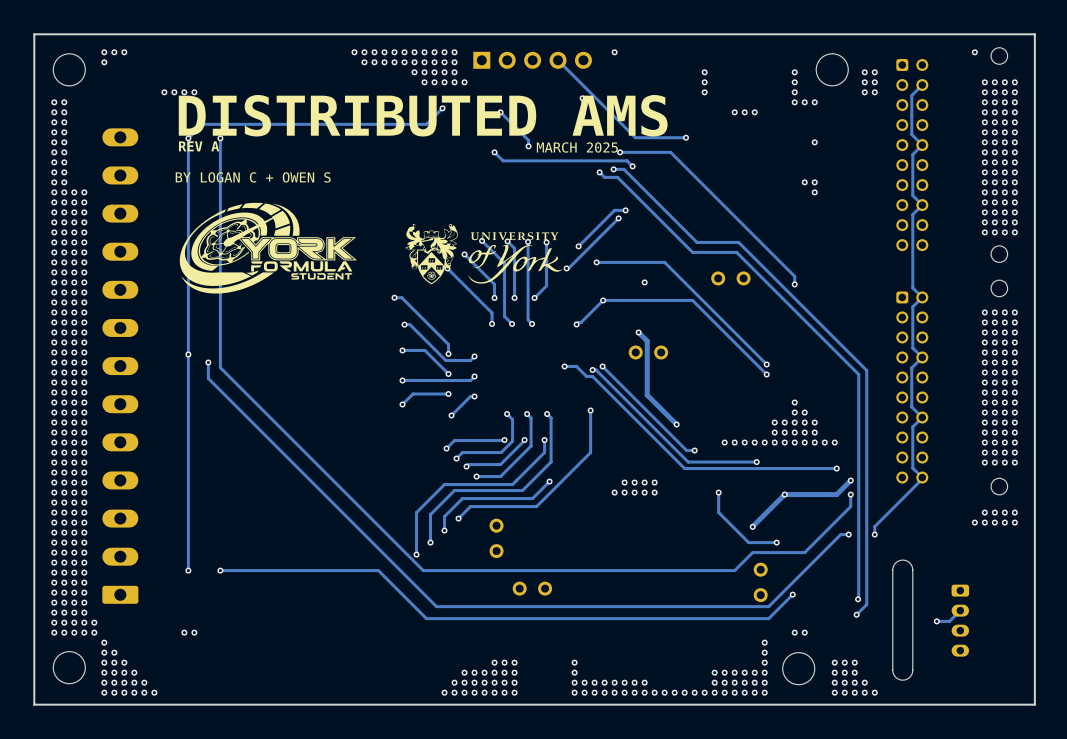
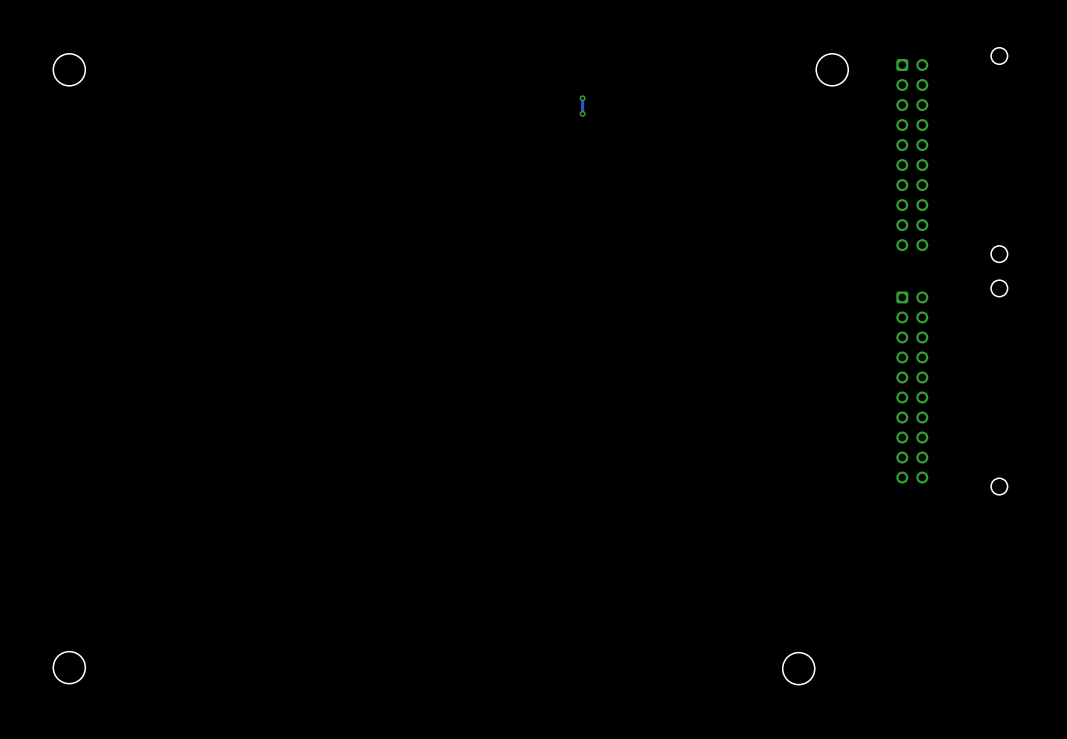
board edge: (1034, 34) (34, 34) (34, 704) (1034, 704) (1034, 34) -> none
via: (104, 52) -> none
via: (114, 52) -> none
via: (124, 52) -> none
via: (354, 52) -> none
via: (364, 52) -> none
via: (374, 52) -> none
via: (384, 52) -> none
via: (394, 52) -> none
via: (404, 52) -> none
via: (414, 52) -> none
via: (424, 52) -> none
via: (434, 52) -> none
via: (444, 52) -> none
via: (454, 52) -> none
via: (614, 52) -> none
via: (974, 52) -> none
part: (532, 60) -> none
track: (558, 60) (635, 137) (686, 137) -> none
via: (104, 62) -> none
via: (364, 62) -> none
via: (374, 62) -> none
via: (384, 62) -> none
via: (394, 62) -> none
via: (404, 62) -> none
via: (414, 62) -> none
via: (424, 62) -> none
via: (434, 62) -> none
via: (444, 62) -> none
via: (454, 62) -> none
via: (414, 72) -> none
via: (424, 72) -> none
via: (434, 72) -> none
via: (444, 72) -> none
via: (454, 72) -> none
via: (704, 72) -> none
via: (794, 72) -> none
via: (864, 72) -> none
via: (874, 72) -> none
via: (424, 82) -> none
via: (434, 82) -> none
via: (444, 82) -> none
via: (454, 82) -> none
via: (464, 82) -> none
via: (704, 82) -> none
via: (794, 82) -> none
via: (864, 82) -> none
via: (874, 82) -> none
via: (984, 82) -> none
via: (994, 82) -> none
via: (1004, 82) -> none
via: (1014, 82) -> none
track: (922, 85) (911, 95) (911, 134) (922, 145) (912, 154) (912, 195) (922, 205) (912, 214) (912, 287) (922, 297) (912, 306) (912, 347) (922, 357) (911, 367) (911, 407) (922, 417) (912, 427) (912, 468) (922, 479) (874, 526) (874, 534) -> none
via: (164, 92) -> none
via: (174, 92) -> none
via: (184, 92) -> none
via: (194, 92) -> none
via: (704, 92) -> none
via: (794, 92) -> none
via: (864, 92) -> none
via: (874, 92) -> none
via: (984, 92) -> none
via: (994, 92) -> none
via: (1004, 92) -> none
via: (1014, 92) -> none
via: (54, 102) -> none
via: (64, 102) -> none
via: (794, 102) -> none
via: (804, 102) -> none
via: (814, 102) -> none
via: (984, 102) -> none
via: (994, 102) -> none
via: (1004, 102) -> none
via: (1014, 102) -> none
track: (442, 108) (426, 124) (202, 124) (188, 138) (188, 570) -> none
via: (442, 108) -> none
via: (54, 112) -> none
via: (64, 112) -> none
track: (500, 112) (528, 140) (528, 146) -> none
via: (500, 112) -> none
via: (734, 112) -> none
via: (744, 112) -> none
via: (754, 112) -> none
via: (984, 112) -> none
via: (994, 112) -> none
via: (1004, 112) -> none
via: (1014, 112) -> none
text: DISTRIBUTED AMS (423, 115) -> none
via: (54, 122) -> none
via: (64, 122) -> none
via: (984, 122) -> none
via: (994, 122) -> none
via: (1004, 122) -> none
via: (1014, 122) -> none
via: (54, 132) -> none
via: (64, 132) -> none
via: (984, 132) -> none
via: (994, 132) -> none
via: (1004, 132) -> none
via: (1014, 132) -> none
via: (686, 137) -> none
via: (188, 138) -> none
track: (220, 138) (220, 367) (423, 570) (734, 570) (752, 552) (804, 552) (850, 506) (850, 494) -> none
via: (220, 138) -> none
via: (54, 142) -> none
via: (64, 142) -> none
via: (814, 142) -> none
via: (984, 142) -> none
via: (994, 142) -> none
via: (1004, 142) -> none
via: (1014, 142) -> none
text: REV A (199, 146) -> none
via: (528, 146) -> none
text: MARCH 2025 (577, 147) -> none
via: (54, 152) -> none
via: (64, 152) -> none
track: (494, 152) (503, 160) (627, 160) (632, 166) -> none
via: (494, 152) -> none
track: (620, 152) (670, 152) (794, 276) (794, 284) -> none
via: (620, 152) -> none
via: (984, 152) -> none
via: (994, 152) -> none
via: (1004, 152) -> none
via: (1014, 152) -> none
via: (54, 162) -> none
via: (64, 162) -> none
via: (984, 162) -> none
via: (994, 162) -> none
via: (1004, 162) -> none
via: (1014, 162) -> none
via: (632, 166) -> none
track: (613, 169) (623, 169) (697, 242) (738, 242) (866, 370) (866, 604) (856, 614) -> none
via: (613, 169) -> none
via: (54, 172) -> none
via: (64, 172) -> none
track: (599, 172) (604, 177) (617, 177) (692, 252) (736, 252) (858, 374) (858, 599) -> none
via: (599, 172) -> none
via: (984, 172) -> none
via: (994, 172) -> none
via: (1004, 172) -> none
via: (1014, 172) -> none
text: BY LOGAN C + OWEN S (253, 177) -> none
via: (54, 182) -> none
via: (64, 182) -> none
via: (804, 182) -> none
via: (814, 182) -> none
via: (984, 182) -> none
via: (994, 182) -> none
via: (1004, 182) -> none
via: (1014, 182) -> none
via: (54, 192) -> none
via: (64, 192) -> none
via: (74, 192) -> none
via: (84, 192) -> none
via: (814, 192) -> none
via: (984, 192) -> none
via: (994, 192) -> none
via: (1004, 192) -> none
via: (1014, 192) -> none
via: (54, 202) -> none
via: (64, 202) -> none
via: (74, 202) -> none
via: (84, 202) -> none
drawing: [179, 202, 357, 294] -> none
via: (984, 202) -> none
via: (994, 202) -> none
via: (1004, 202) -> none
via: (1014, 202) -> none
track: (625, 210) (614, 210) (578, 246) -> none
via: (625, 210) -> none
via: (54, 212) -> none
via: (64, 212) -> none
via: (74, 212) -> none
via: (84, 212) -> none
via: (984, 212) -> none
via: (994, 212) -> none
via: (1004, 212) -> none
via: (1014, 212) -> none
track: (618, 218) (566, 268) -> none
via: (618, 218) -> none
via: (54, 222) -> none
via: (64, 222) -> none
via: (74, 222) -> none
via: (84, 222) -> none
via: (984, 222) -> none
via: (994, 222) -> none
via: (1004, 222) -> none
via: (1014, 222) -> none
drawing: [405, 223, 563, 285] -> none
via: (54, 232) -> none
via: (64, 232) -> none
via: (74, 232) -> none
via: (84, 232) -> none
via: (984, 232) -> none
via: (994, 232) -> none
via: (1004, 232) -> none
via: (1014, 232) -> none
track: (482, 240) (504, 263) (504, 316) (512, 323) -> none
via: (482, 240) -> none
track: (507, 241) (514, 248) (514, 297) -> none
via: (507, 241) -> none
track: (528, 241) (528, 319) (532, 323) -> none
via: (528, 241) -> none
via: (54, 242) -> none
via: (64, 242) -> none
via: (74, 242) -> none
via: (84, 242) -> none
track: (546, 242) (546, 285) (534, 297) -> none
via: (546, 242) -> none
via: (578, 246) -> none
via: (54, 252) -> none
via: (64, 252) -> none
via: (74, 252) -> none
via: (84, 252) -> none
track: (464, 254) (494, 284) (494, 297) -> none
via: (464, 254) -> none
via: (54, 262) -> none
via: (64, 262) -> none
via: (74, 262) -> none
via: (84, 262) -> none
track: (596, 262) (664, 262) (766, 364) -> none
via: (596, 262) -> none
track: (447, 268) (492, 312) (492, 323) -> none
via: (447, 268) -> none
via: (566, 268) -> none
via: (54, 272) -> none
via: (64, 272) -> none
via: (74, 272) -> none
via: (84, 272) -> none
part: (730, 278) -> none
via: (54, 282) -> none
via: (64, 282) -> none
via: (74, 282) -> none
via: (84, 282) -> none
via: (644, 282) -> none
via: (794, 284) -> none
via: (54, 292) -> none
via: (64, 292) -> none
via: (74, 292) -> none
via: (84, 292) -> none
track: (394, 297) (401, 297) (448, 344) (448, 353) -> none
via: (394, 297) -> none
via: (494, 297) -> none
via: (514, 297) -> none
via: (534, 297) -> none
via: (603, 300) -> none
via: (54, 302) -> none
via: (64, 302) -> none
via: (74, 302) -> none
via: (84, 302) -> none
via: (54, 312) -> none
via: (64, 312) -> none
via: (74, 312) -> none
via: (84, 312) -> none
via: (984, 312) -> none
via: (994, 312) -> none
via: (1004, 312) -> none
via: (1014, 312) -> none
via: (54, 322) -> none
via: (64, 322) -> none
via: (74, 322) -> none
via: (84, 322) -> none
via: (984, 322) -> none
via: (994, 322) -> none
via: (1004, 322) -> none
via: (1014, 322) -> none
via: (492, 323) -> none
via: (512, 323) -> none
via: (532, 323) -> none
track: (404, 324) (410, 324) (445, 360) (470, 360) (474, 356) -> none
via: (404, 324) -> none
track: (576, 324) (581, 322) (603, 300) (692, 300) (766, 374) -> none
via: (576, 324) -> none
via: (54, 332) -> none
via: (64, 332) -> none
via: (74, 332) -> none
via: (84, 332) -> none
track: (638, 332) (647, 341) (647, 395) (676, 424) -> none
via: (638, 332) -> none
via: (984, 332) -> none
via: (994, 332) -> none
via: (1004, 332) -> none
via: (1014, 332) -> none
via: (54, 342) -> none
via: (64, 342) -> none
via: (74, 342) -> none
via: (84, 342) -> none
via: (984, 342) -> none
via: (994, 342) -> none
via: (1004, 342) -> none
via: (1014, 342) -> none
track: (402, 350) (425, 350) (448, 373) -> none
via: (402, 350) -> none
via: (54, 352) -> none
via: (64, 352) -> none
via: (74, 352) -> none
via: (84, 352) -> none
part: (648, 352) -> none
via: (984, 352) -> none
via: (994, 352) -> none
via: (1004, 352) -> none
via: (1014, 352) -> none
via: (448, 353) -> none
via: (188, 354) -> none
via: (474, 356) -> none
via: (54, 362) -> none
via: (64, 362) -> none
via: (74, 362) -> none
via: (84, 362) -> none
track: (208, 362) (208, 378) (436, 606) (768, 606) (840, 534) (848, 534) -> none
via: (208, 362) -> none
via: (984, 362) -> none
via: (994, 362) -> none
via: (1004, 362) -> none
via: (1014, 362) -> none
via: (766, 364) -> none
part: (120, 366) -> none
track: (564, 366) (576, 366) (586, 376) (592, 376) (684, 468) (836, 468) -> none
via: (564, 366) -> none
track: (602, 366) (686, 450) (694, 450) -> none
via: (602, 366) -> none
track: (592, 369) (596, 369) (688, 462) (756, 462) -> none
via: (592, 369) -> none
via: (54, 372) -> none
via: (64, 372) -> none
via: (74, 372) -> none
via: (84, 372) -> none
via: (984, 372) -> none
via: (994, 372) -> none
via: (1004, 372) -> none
via: (1014, 372) -> none
via: (448, 373) -> none
via: (766, 374) -> none
track: (474, 376) (470, 380) (402, 380) -> none
via: (474, 376) -> none
via: (402, 380) -> none
via: (54, 382) -> none
via: (64, 382) -> none
via: (74, 382) -> none
via: (84, 382) -> none
via: (984, 382) -> none
via: (994, 382) -> none
via: (1004, 382) -> none
via: (1014, 382) -> none
via: (54, 392) -> none
via: (64, 392) -> none
via: (74, 392) -> none
via: (84, 392) -> none
via: (984, 392) -> none
via: (994, 392) -> none
via: (1004, 392) -> none
via: (1014, 392) -> none
track: (448, 394) (413, 394) (402, 404) -> none
via: (448, 394) -> none
track: (474, 396) (470, 396) (451, 415) -> none
via: (474, 396) -> none
via: (54, 402) -> none
via: (64, 402) -> none
via: (74, 402) -> none
via: (84, 402) -> none
via: (794, 402) -> none
via: (984, 402) -> none
via: (994, 402) -> none
via: (1004, 402) -> none
via: (1014, 402) -> none
via: (402, 404) -> none
track: (590, 410) (590, 452) (536, 506) (470, 506) (458, 518) -> none
via: (590, 410) -> none
via: (54, 412) -> none
via: (64, 412) -> none
via: (74, 412) -> none
via: (84, 412) -> none
via: (794, 412) -> none
via: (804, 412) -> none
via: (984, 412) -> none
via: (994, 412) -> none
via: (1004, 412) -> none
via: (1014, 412) -> none
track: (507, 414) (512, 419) (512, 441) (501, 452) (462, 452) (456, 458) -> none
via: (507, 414) -> none
track: (527, 414) (531, 418) (531, 446) (500, 476) (476, 476) -> none
via: (527, 414) -> none
track: (547, 414) (551, 418) (551, 462) (522, 490) (454, 490) (430, 514) (430, 542) -> none
via: (547, 414) -> none
via: (451, 415) -> none
via: (54, 422) -> none
via: (64, 422) -> none
via: (74, 422) -> none
via: (84, 422) -> none
via: (774, 422) -> none
via: (784, 422) -> none
via: (794, 422) -> none
via: (804, 422) -> none
via: (814, 422) -> none
via: (984, 422) -> none
via: (994, 422) -> none
via: (1004, 422) -> none
via: (1014, 422) -> none
via: (676, 424) -> none
via: (54, 432) -> none
via: (64, 432) -> none
via: (74, 432) -> none
via: (84, 432) -> none
via: (774, 432) -> none
via: (784, 432) -> none
via: (794, 432) -> none
via: (804, 432) -> none
via: (814, 432) -> none
via: (984, 432) -> none
via: (994, 432) -> none
via: (1004, 432) -> none
via: (1014, 432) -> none
track: (504, 440) (454, 440) (446, 448) -> none
via: (504, 440) -> none
track: (524, 440) (500, 464) (468, 464) (466, 466) -> none
via: (524, 440) -> none
track: (544, 440) (544, 452) (512, 484) (444, 484) (416, 512) (416, 554) -> none
via: (544, 440) -> none
via: (54, 442) -> none
via: (64, 442) -> none
via: (74, 442) -> none
via: (84, 442) -> none
via: (724, 442) -> none
via: (734, 442) -> none
via: (744, 442) -> none
via: (754, 442) -> none
via: (764, 442) -> none
via: (774, 442) -> none
via: (784, 442) -> none
via: (794, 442) -> none
via: (804, 442) -> none
via: (814, 442) -> none
via: (824, 442) -> none
via: (834, 442) -> none
via: (984, 442) -> none
via: (994, 442) -> none
via: (1004, 442) -> none
via: (1014, 442) -> none
via: (446, 448) -> none
via: (694, 450) -> none
via: (54, 452) -> none
via: (64, 452) -> none
via: (74, 452) -> none
via: (84, 452) -> none
via: (984, 452) -> none
via: (994, 452) -> none
via: (1004, 452) -> none
via: (1014, 452) -> none
via: (456, 458) -> none
via: (54, 462) -> none
via: (64, 462) -> none
via: (74, 462) -> none
via: (84, 462) -> none
via: (756, 462) -> none
via: (984, 462) -> none
via: (994, 462) -> none
via: (1004, 462) -> none
via: (1014, 462) -> none
via: (466, 466) -> none
via: (836, 468) -> none
via: (54, 472) -> none
via: (64, 472) -> none
via: (74, 472) -> none
via: (84, 472) -> none
via: (476, 476) -> none
track: (850, 480) (836, 494) (784, 494) (752, 526) -> none
via: (850, 480) -> none
track: (549, 481) (532, 498) (462, 498) (444, 516) (444, 530) -> none
via: (549, 481) -> none
via: (54, 482) -> none
via: (64, 482) -> none
via: (74, 482) -> none
via: (84, 482) -> none
via: (624, 482) -> none
via: (634, 482) -> none
via: (644, 482) -> none
via: (654, 482) -> none
via: (54, 492) -> none
via: (64, 492) -> none
via: (74, 492) -> none
via: (84, 492) -> none
via: (614, 492) -> none
via: (624, 492) -> none
via: (634, 492) -> none
via: (644, 492) -> none
via: (654, 492) -> none
track: (718, 492) (718, 512) (748, 542) (776, 542) -> none
via: (718, 492) -> none
via: (784, 494) -> none
via: (850, 494) -> none
via: (54, 502) -> none
via: (64, 502) -> none
via: (74, 502) -> none
via: (84, 502) -> none
via: (54, 512) -> none
via: (64, 512) -> none
via: (74, 512) -> none
via: (84, 512) -> none
via: (984, 512) -> none
via: (994, 512) -> none
via: (1004, 512) -> none
via: (1014, 512) -> none
via: (458, 518) -> none
via: (54, 522) -> none
via: (64, 522) -> none
via: (74, 522) -> none
via: (84, 522) -> none
via: (974, 522) -> none
via: (984, 522) -> none
via: (994, 522) -> none
via: (1004, 522) -> none
via: (1014, 522) -> none
via: (752, 526) -> none
via: (444, 530) -> none
via: (54, 532) -> none
via: (64, 532) -> none
via: (74, 532) -> none
via: (84, 532) -> none
via: (848, 534) -> none
via: (874, 534) -> none
part: (496, 538) -> none
via: (54, 542) -> none
via: (64, 542) -> none
via: (74, 542) -> none
via: (84, 542) -> none
via: (430, 542) -> none
via: (776, 542) -> none
via: (54, 552) -> none
via: (64, 552) -> none
via: (74, 552) -> none
via: (84, 552) -> none
via: (416, 554) -> none
via: (54, 562) -> none
via: (64, 562) -> none
via: (74, 562) -> none
via: (84, 562) -> none
via: (188, 570) -> none
track: (220, 570) (378, 570) (426, 618) (768, 618) (792, 594) -> none
via: (220, 570) -> none
board edge: (912, 570) (912, 671) (908, 678) (901, 680) (896, 677) (892, 671) (892, 568) (896, 562) (902, 560) (910, 563) (912, 570) -> none
via: (54, 572) -> none
via: (64, 572) -> none
via: (74, 572) -> none
via: (84, 572) -> none
via: (54, 582) -> none
via: (64, 582) -> none
via: (74, 582) -> none
via: (84, 582) -> none
part: (760, 582) -> none
part: (532, 588) -> none
via: (54, 592) -> none
via: (64, 592) -> none
via: (74, 592) -> none
via: (84, 592) -> none
via: (792, 594) -> none
via: (858, 599) -> none
via: (54, 602) -> none
via: (64, 602) -> none
via: (74, 602) -> none
via: (84, 602) -> none
track: (960, 610) (949, 621) (936, 621) -> none
via: (54, 612) -> none
via: (64, 612) -> none
via: (74, 612) -> none
via: (84, 612) -> none
via: (856, 614) -> none
part: (960, 620) -> none
via: (936, 621) -> none
via: (54, 622) -> none
via: (64, 622) -> none
via: (74, 622) -> none
via: (84, 622) -> none
via: (94, 622) -> none
via: (54, 632) -> none
via: (64, 632) -> none
via: (74, 632) -> none
via: (84, 632) -> none
via: (94, 632) -> none
via: (184, 632) -> none
via: (194, 632) -> none
via: (794, 632) -> none
via: (804, 632) -> none
via: (104, 642) -> none
via: (764, 642) -> none
via: (104, 652) -> none
via: (114, 652) -> none
via: (764, 652) -> none
via: (104, 662) -> none
via: (114, 662) -> none
via: (124, 662) -> none
via: (494, 662) -> none
via: (504, 662) -> none
via: (514, 662) -> none
via: (574, 662) -> none
via: (764, 662) -> none
via: (834, 662) -> none
via: (844, 662) -> none
via: (854, 662) -> none
via: (104, 672) -> none
via: (114, 672) -> none
via: (124, 672) -> none
via: (134, 672) -> none
via: (464, 672) -> none
via: (474, 672) -> none
via: (484, 672) -> none
via: (494, 672) -> none
via: (504, 672) -> none
via: (514, 672) -> none
via: (574, 672) -> none
via: (714, 672) -> none
via: (724, 672) -> none
via: (734, 672) -> none
via: (744, 672) -> none
via: (754, 672) -> none
via: (764, 672) -> none
via: (834, 672) -> none
via: (844, 672) -> none
via: (854, 672) -> none
via: (104, 682) -> none
via: (114, 682) -> none
via: (124, 682) -> none
via: (134, 682) -> none
via: (144, 682) -> none
via: (454, 682) -> none
via: (464, 682) -> none
via: (474, 682) -> none
via: (484, 682) -> none
via: (494, 682) -> none
via: (504, 682) -> none
via: (514, 682) -> none
via: (574, 682) -> none
via: (584, 682) -> none
via: (594, 682) -> none
via: (604, 682) -> none
via: (614, 682) -> none
via: (624, 682) -> none
via: (634, 682) -> none
via: (644, 682) -> none
via: (714, 682) -> none
via: (724, 682) -> none
via: (734, 682) -> none
via: (744, 682) -> none
via: (754, 682) -> none
via: (764, 682) -> none
via: (834, 682) -> none
via: (844, 682) -> none
via: (854, 682) -> none
via: (864, 682) -> none
via: (104, 692) -> none
via: (114, 692) -> none
via: (124, 692) -> none
via: (134, 692) -> none
via: (144, 692) -> none
via: (154, 692) -> none
via: (444, 692) -> none
via: (454, 692) -> none
via: (464, 692) -> none
via: (474, 692) -> none
via: (484, 692) -> none
via: (494, 692) -> none
via: (504, 692) -> none
via: (514, 692) -> none
via: (574, 692) -> none
via: (584, 692) -> none
via: (594, 692) -> none
via: (604, 692) -> none
via: (614, 692) -> none
via: (624, 692) -> none
via: (634, 692) -> none
via: (644, 692) -> none
via: (654, 692) -> none
via: (664, 692) -> none
via: (674, 692) -> none
via: (684, 692) -> none
via: (694, 692) -> none
via: (704, 692) -> none
via: (714, 692) -> none
via: (724, 692) -> none
via: (734, 692) -> none
via: (744, 692) -> none
via: (754, 692) -> none
via: (764, 692) -> none
via: (834, 692) -> none
via: (844, 692) -> none
via: (854, 692) -> none
via: (864, 692) -> none
via: (874, 692) -> none

